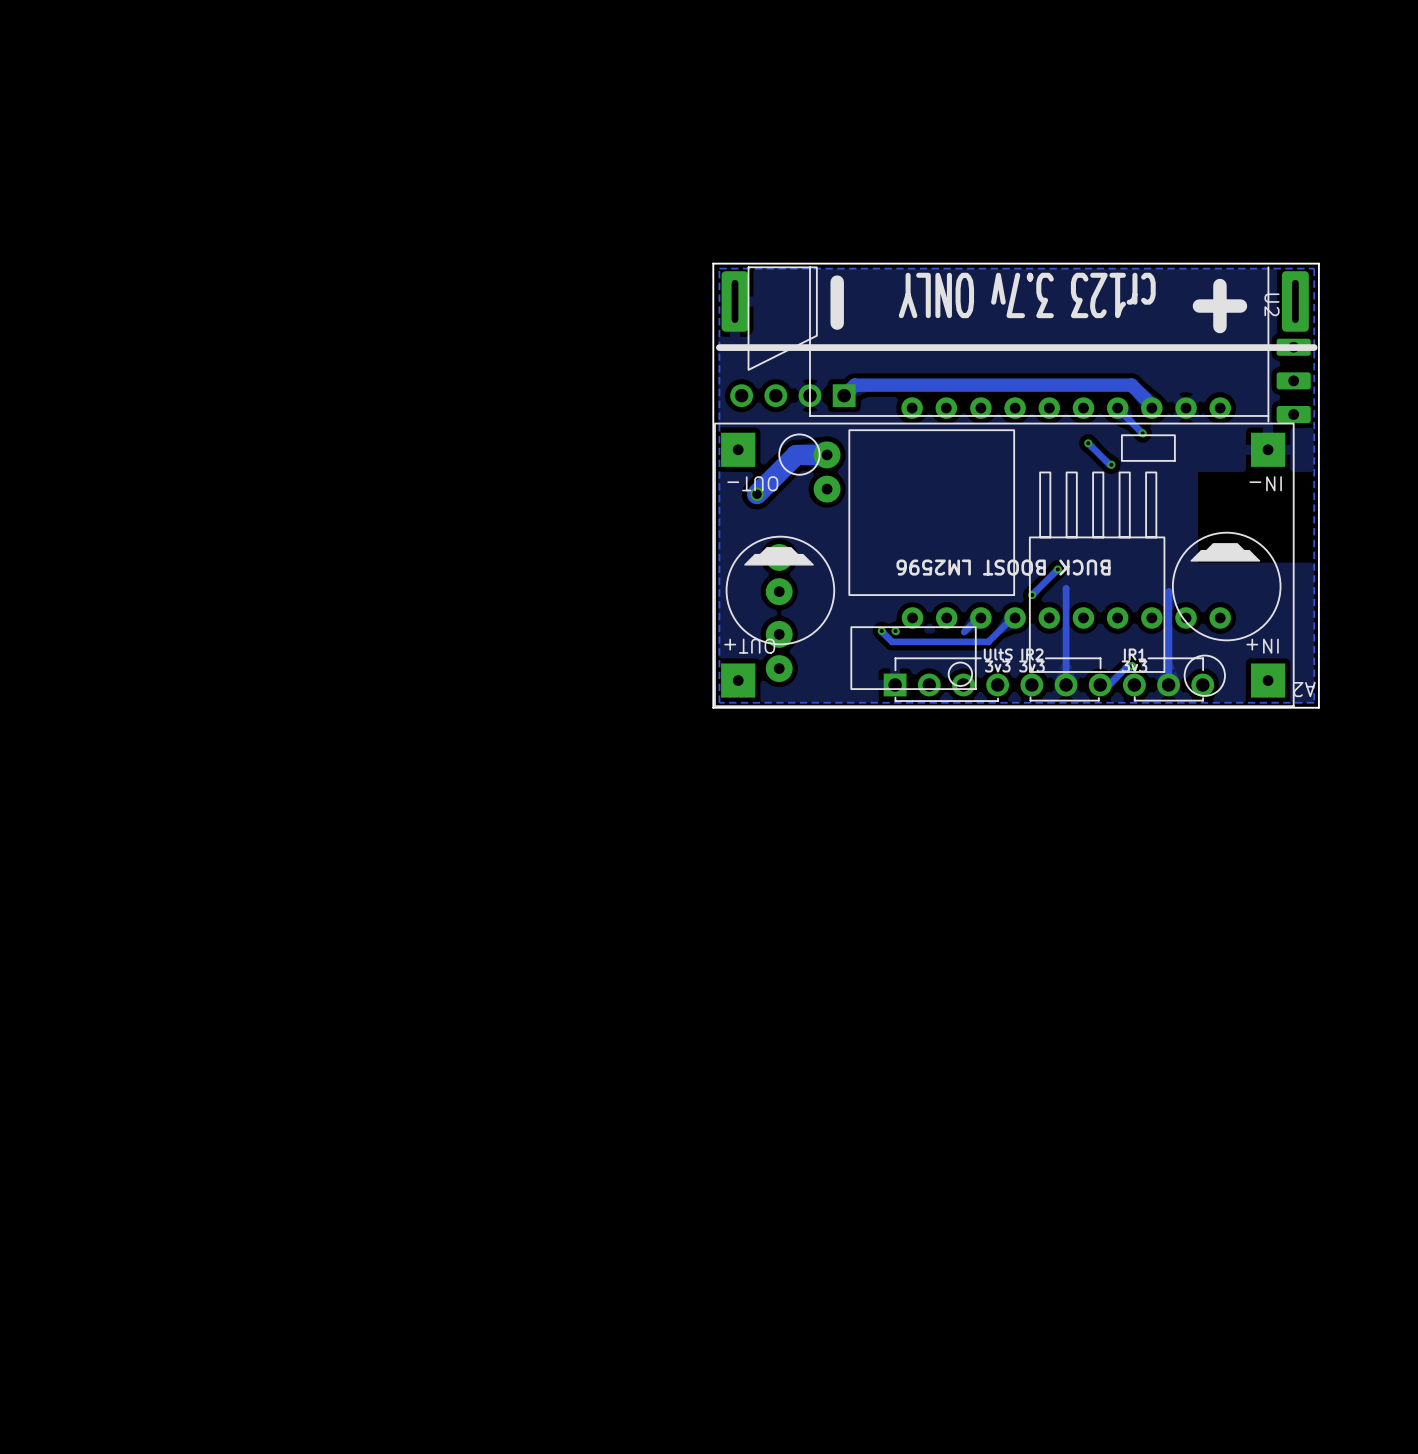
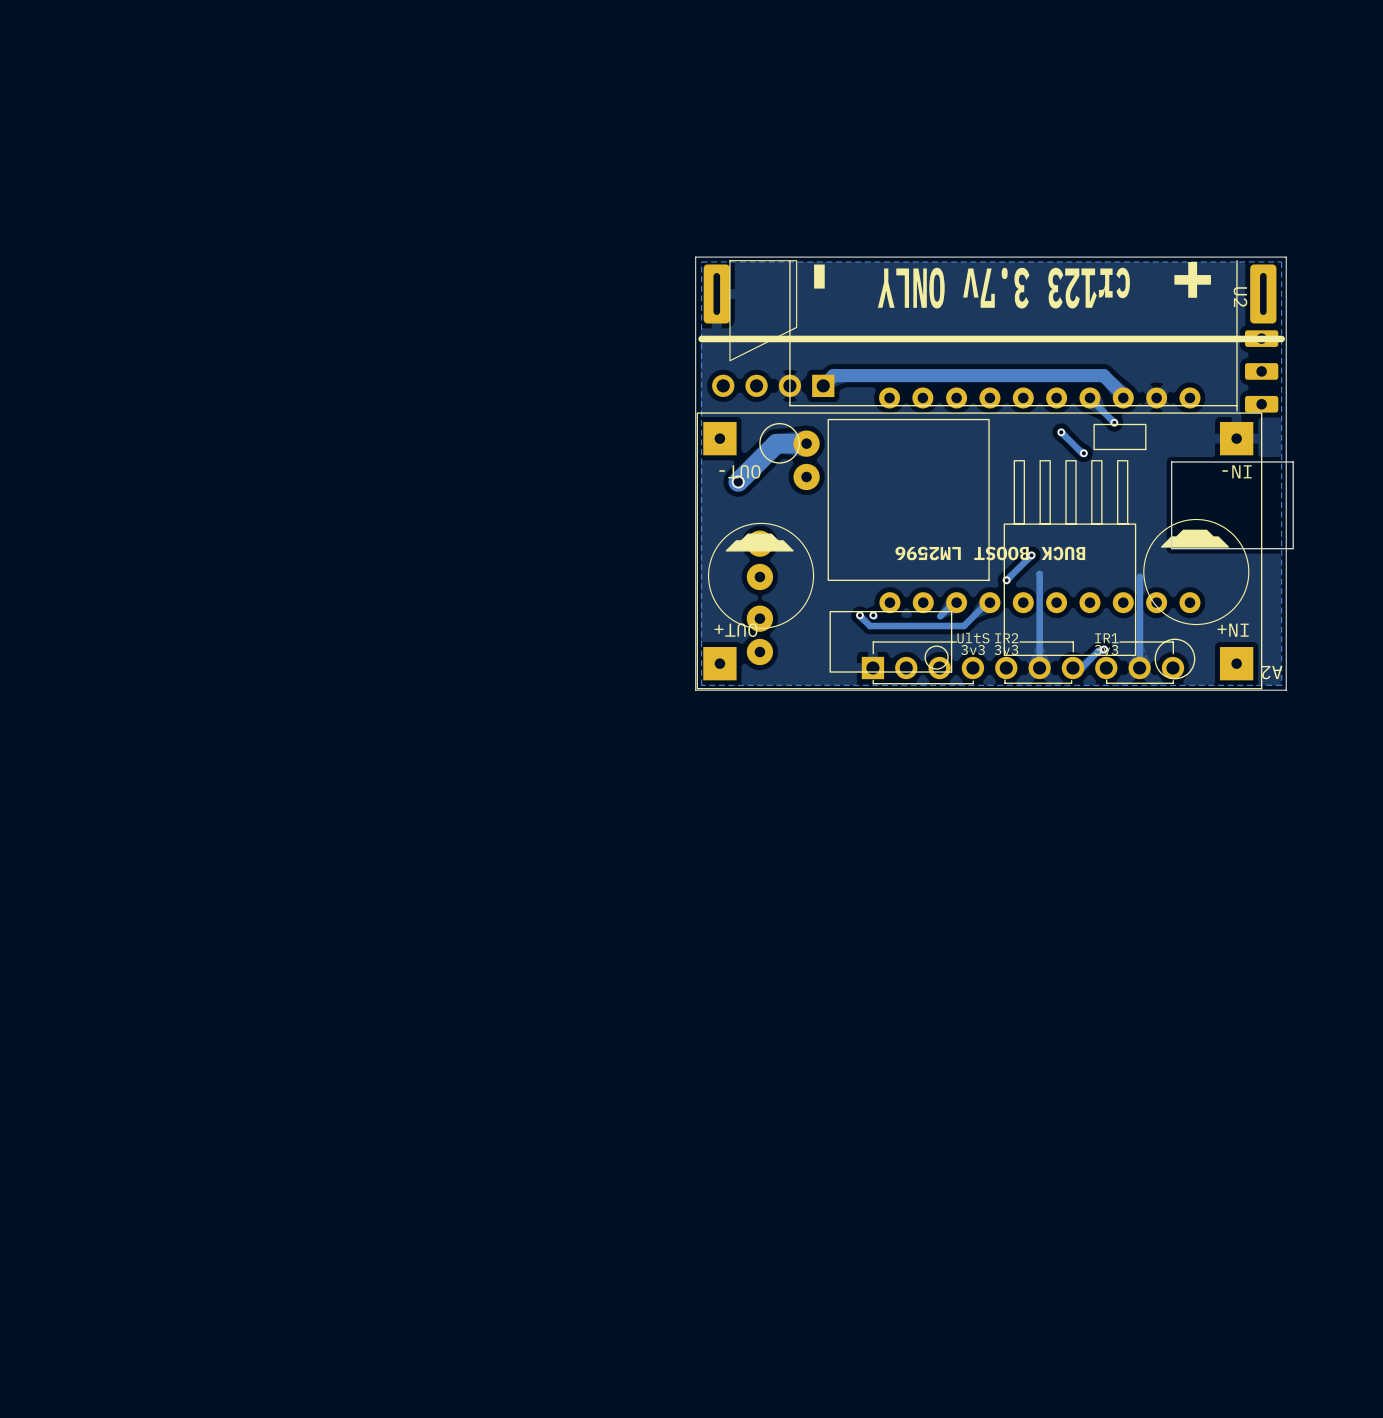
board edge: none -> (1293, 461) (1171, 461) (1171, 548) (1293, 548) (1293, 461)

